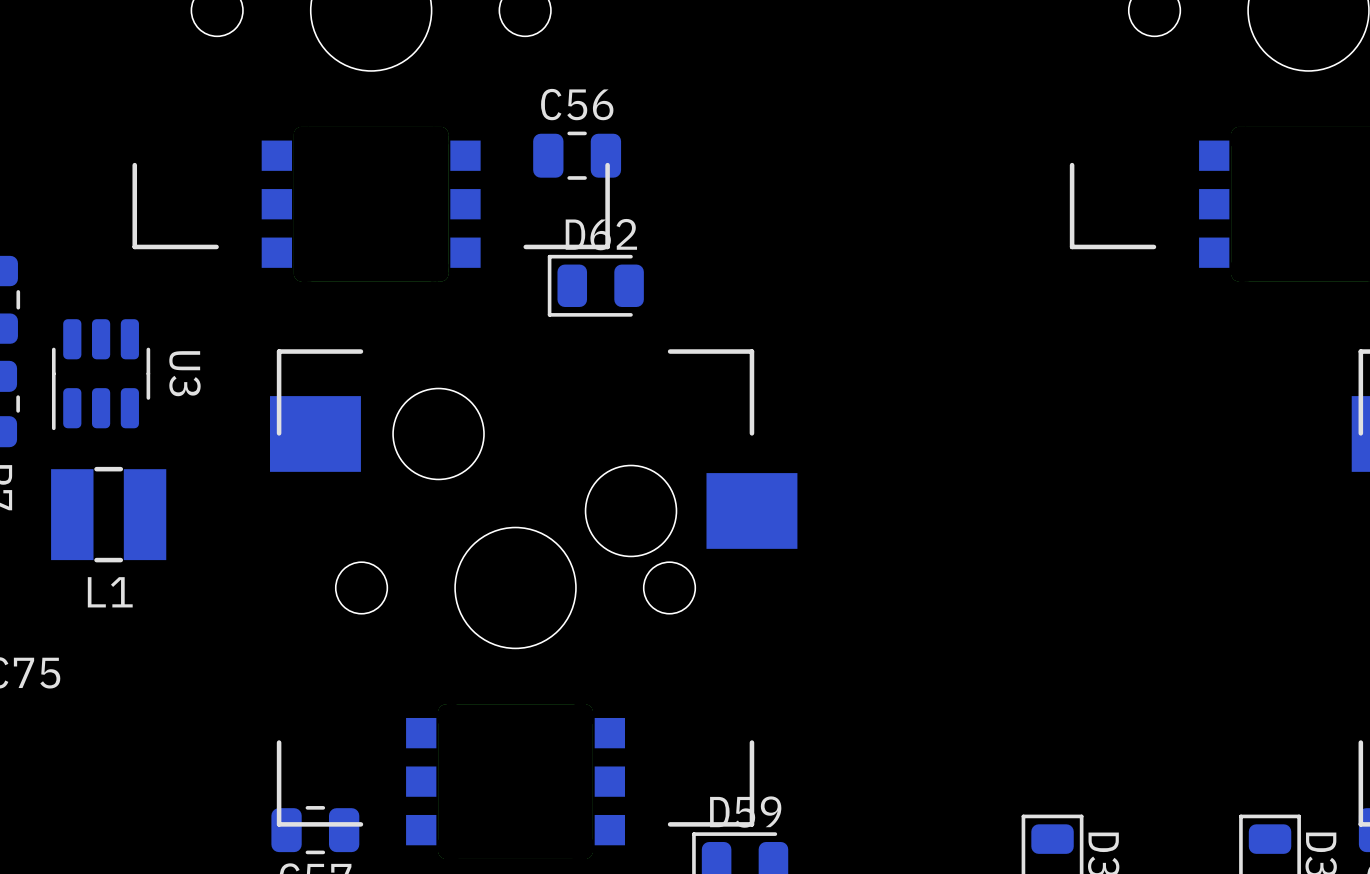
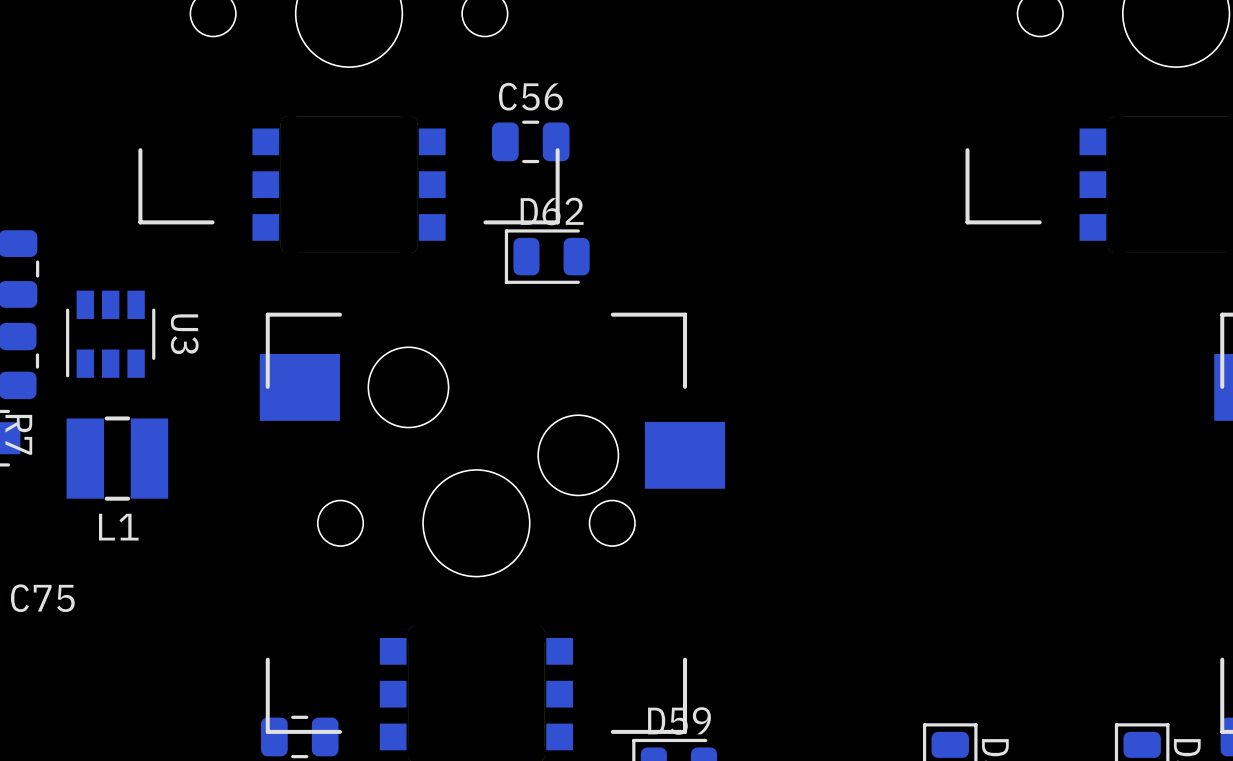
U3 footprint: [51, 319, 151, 431] -> [66, 290, 156, 378]

